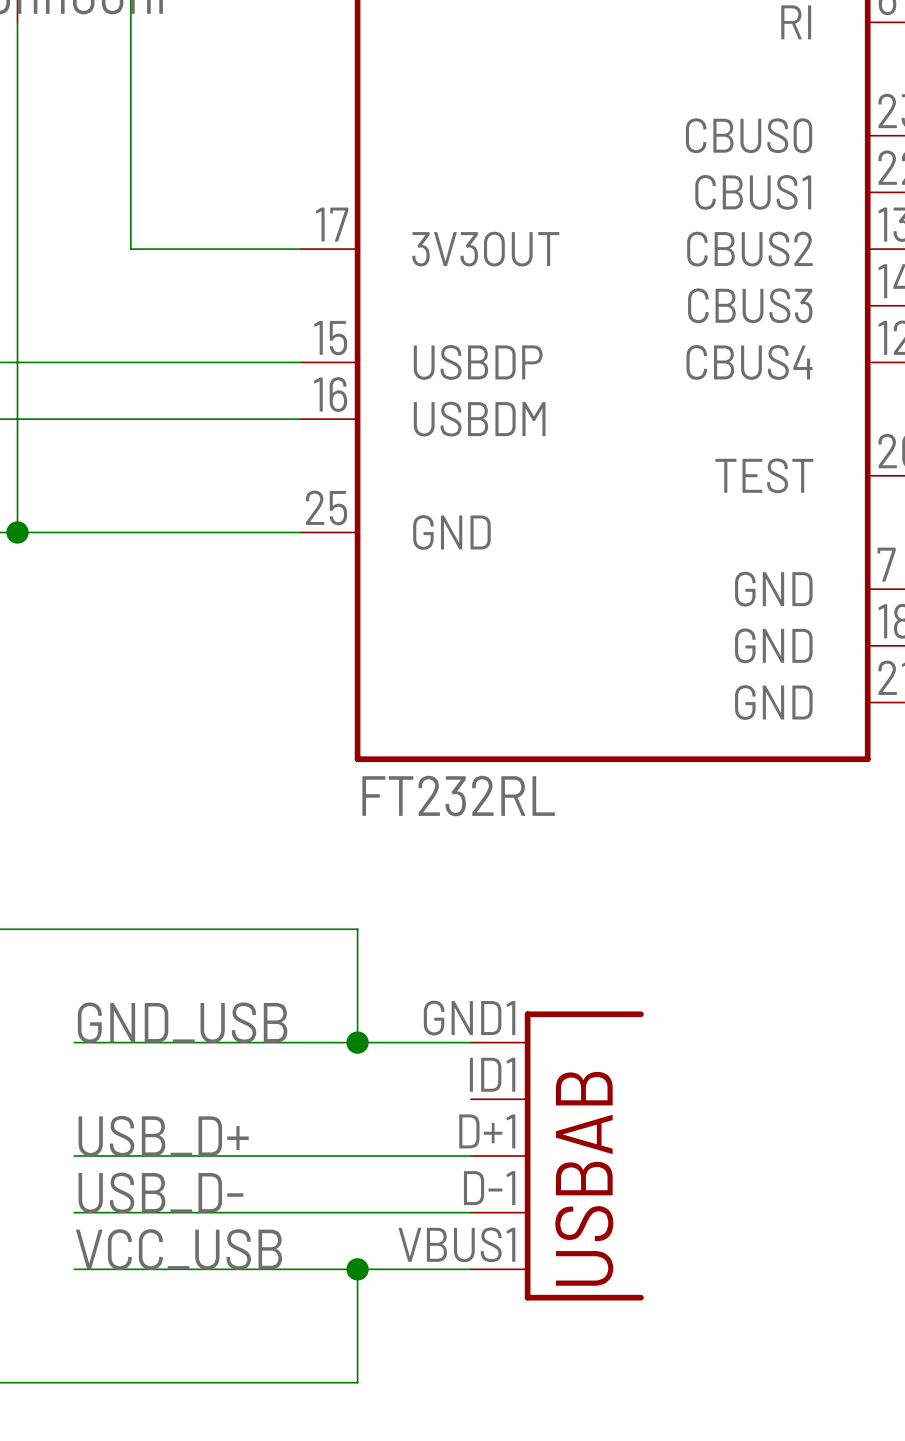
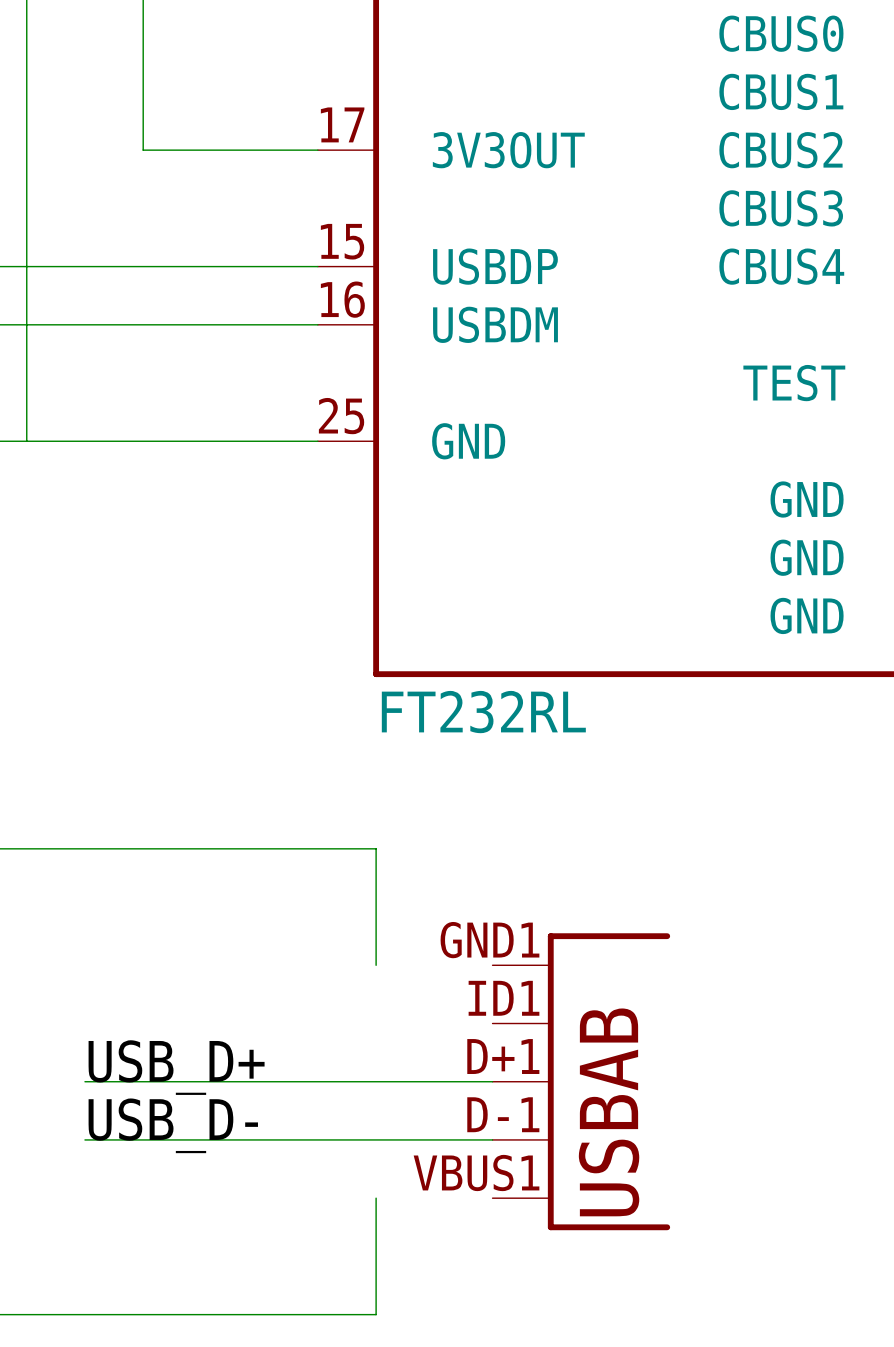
junction: (17, 532) -> none
label: GND_USB (182, 1022) -> none
wire: (74, 1042) (470, 1042) -> none
junction: (357, 1042) -> none
label: VCC_USB (178, 1249) -> none
wire: (74, 1269) (470, 1269) -> none
junction: (357, 1269) -> none

